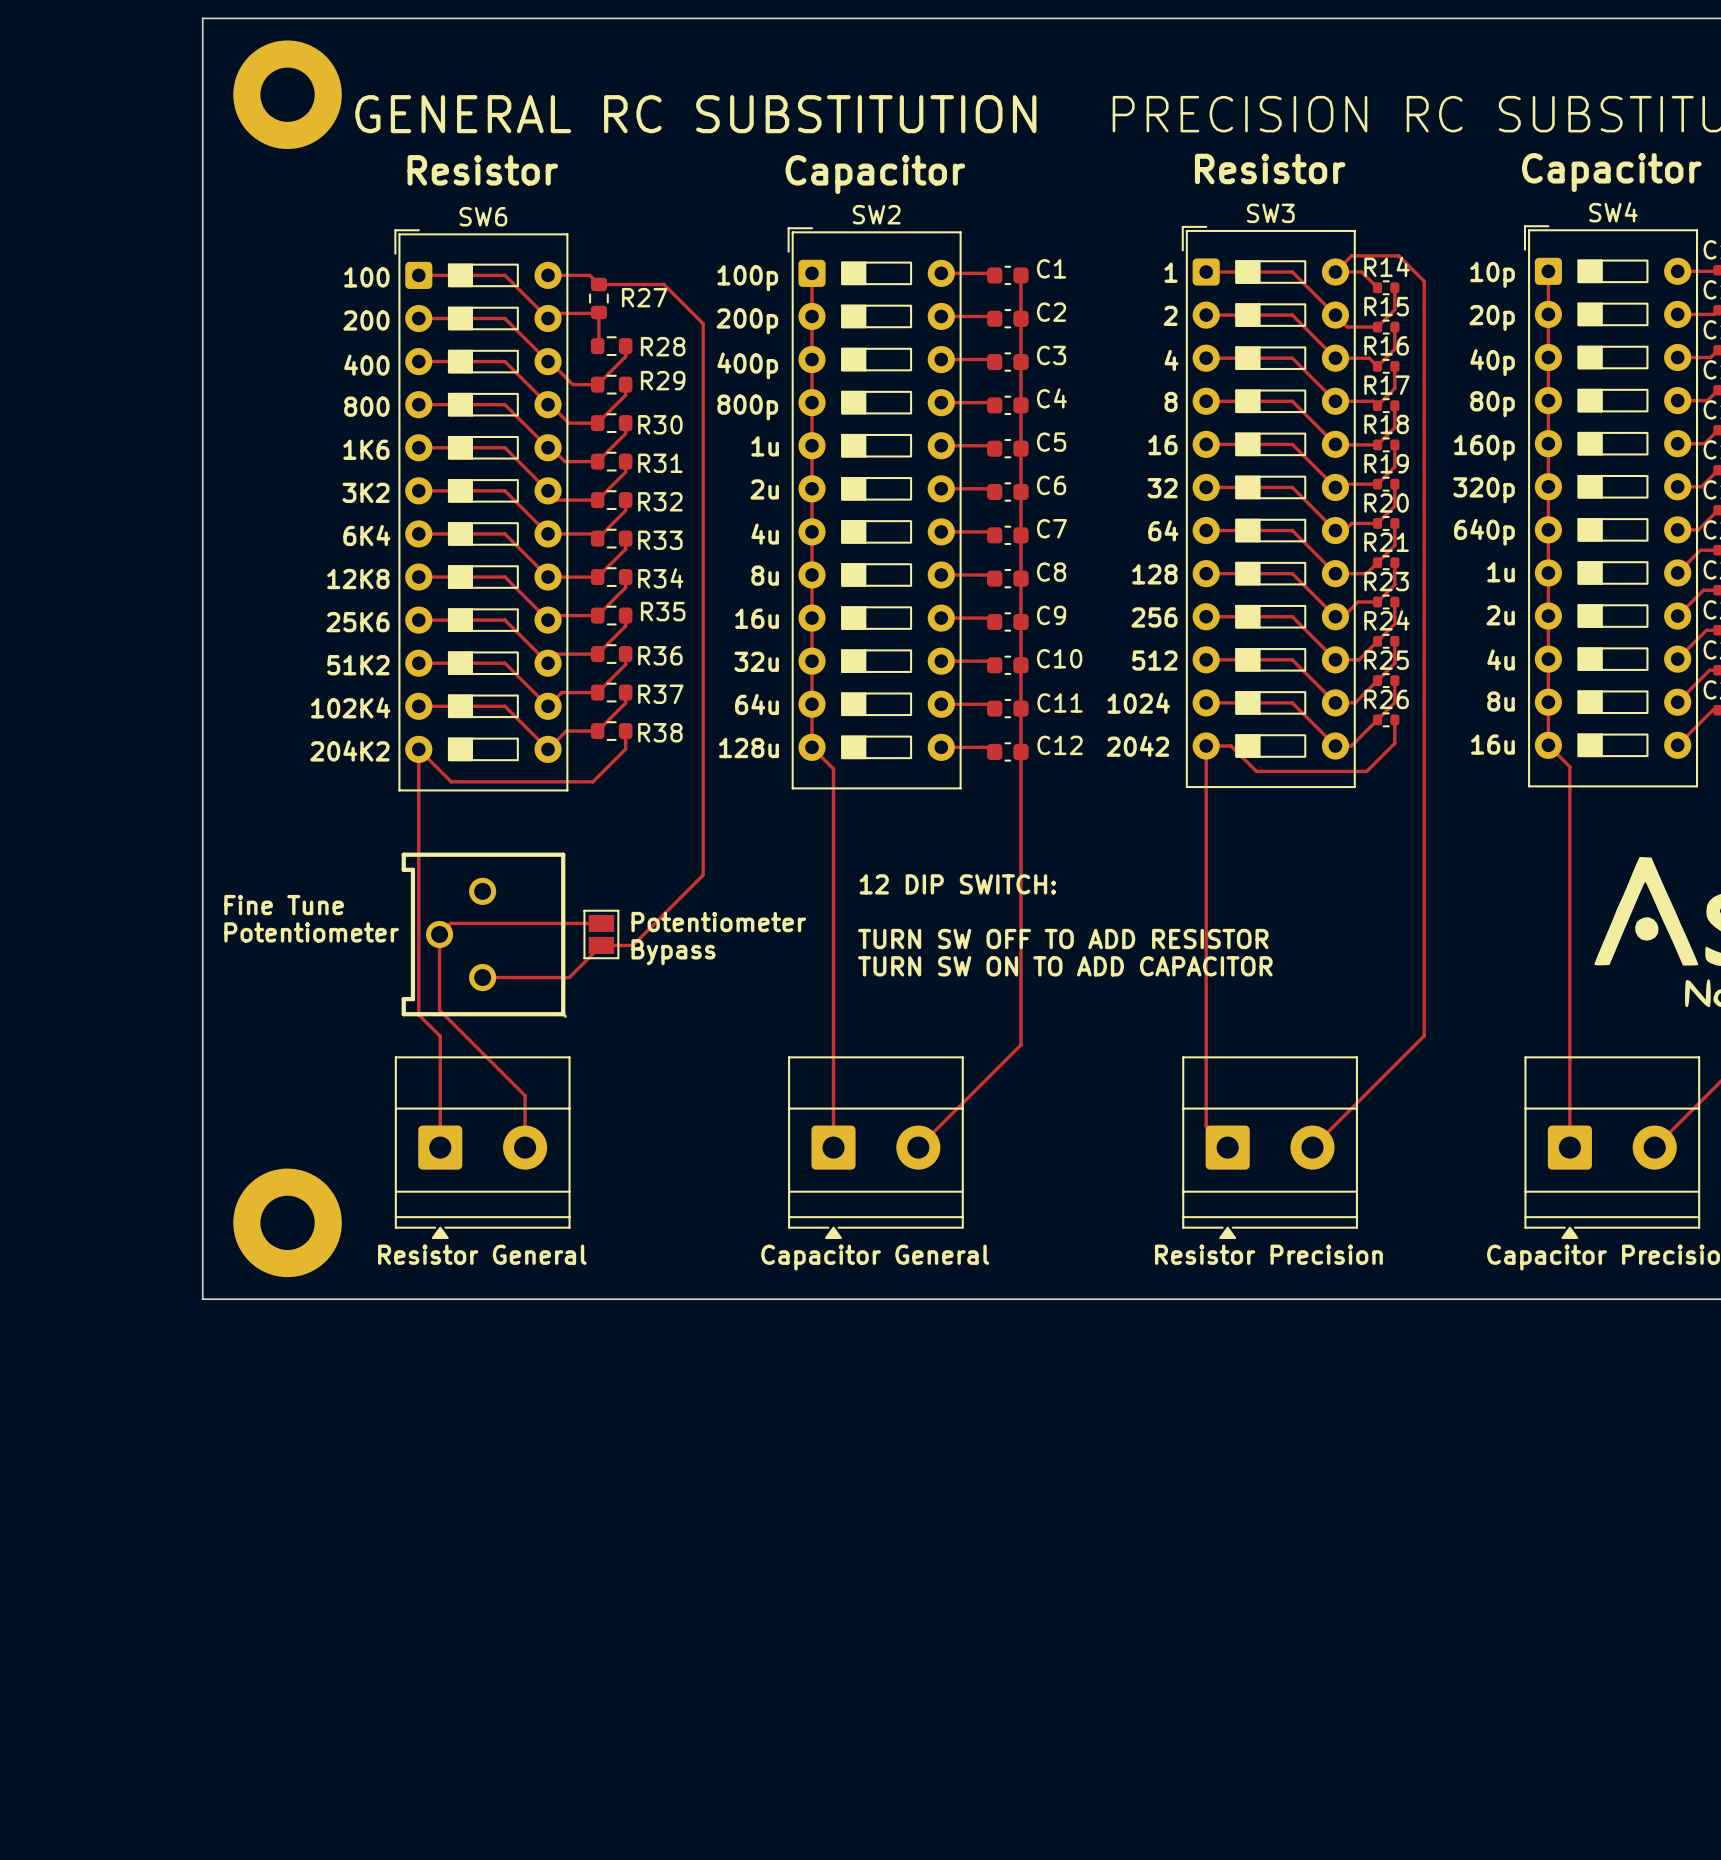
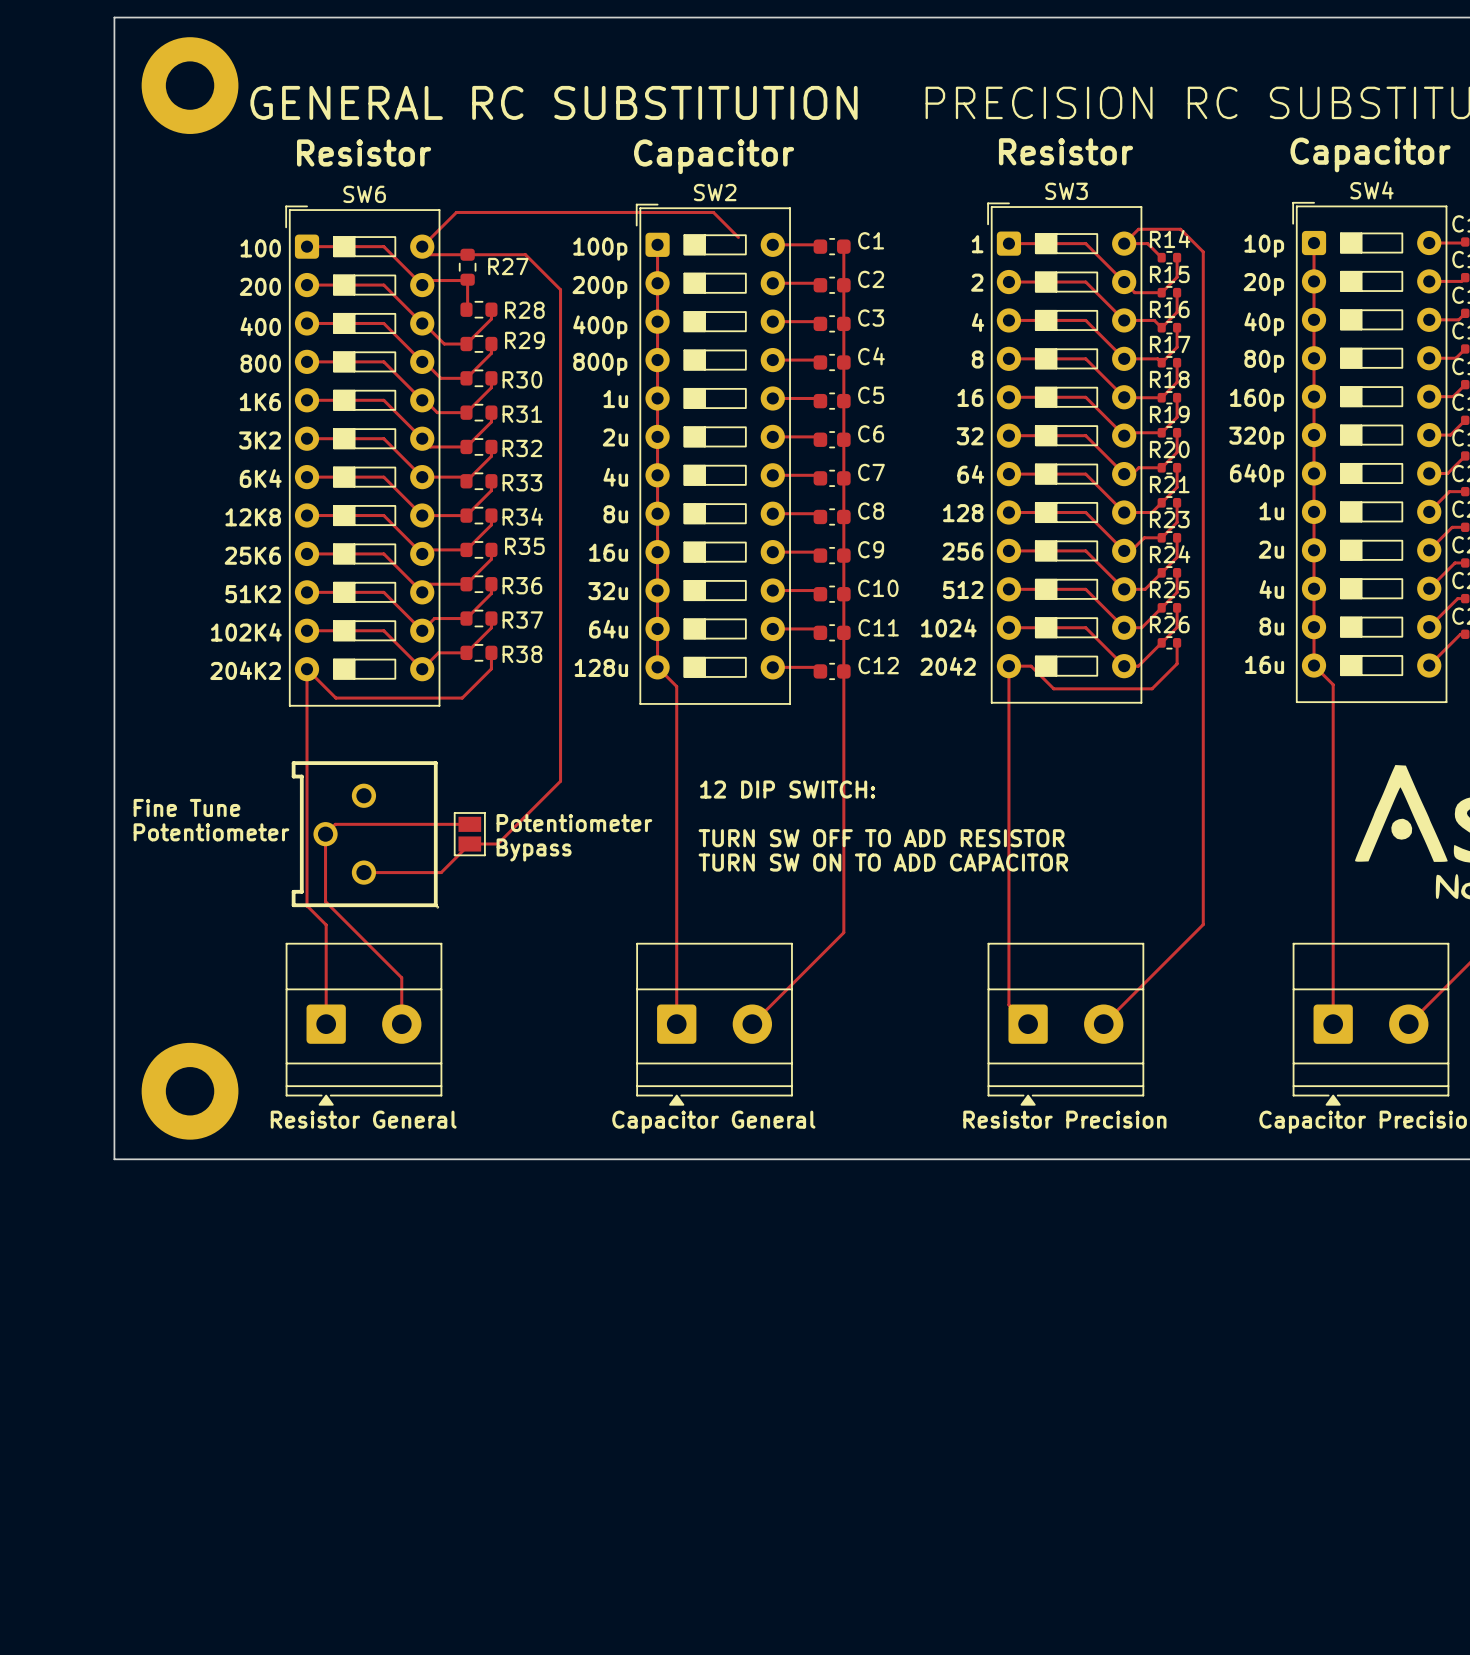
top track: (548, 275) (589, 275) (598, 284) -> (738, 237) (713, 212) (456, 212) (422, 246) (430, 254) (467, 254)

